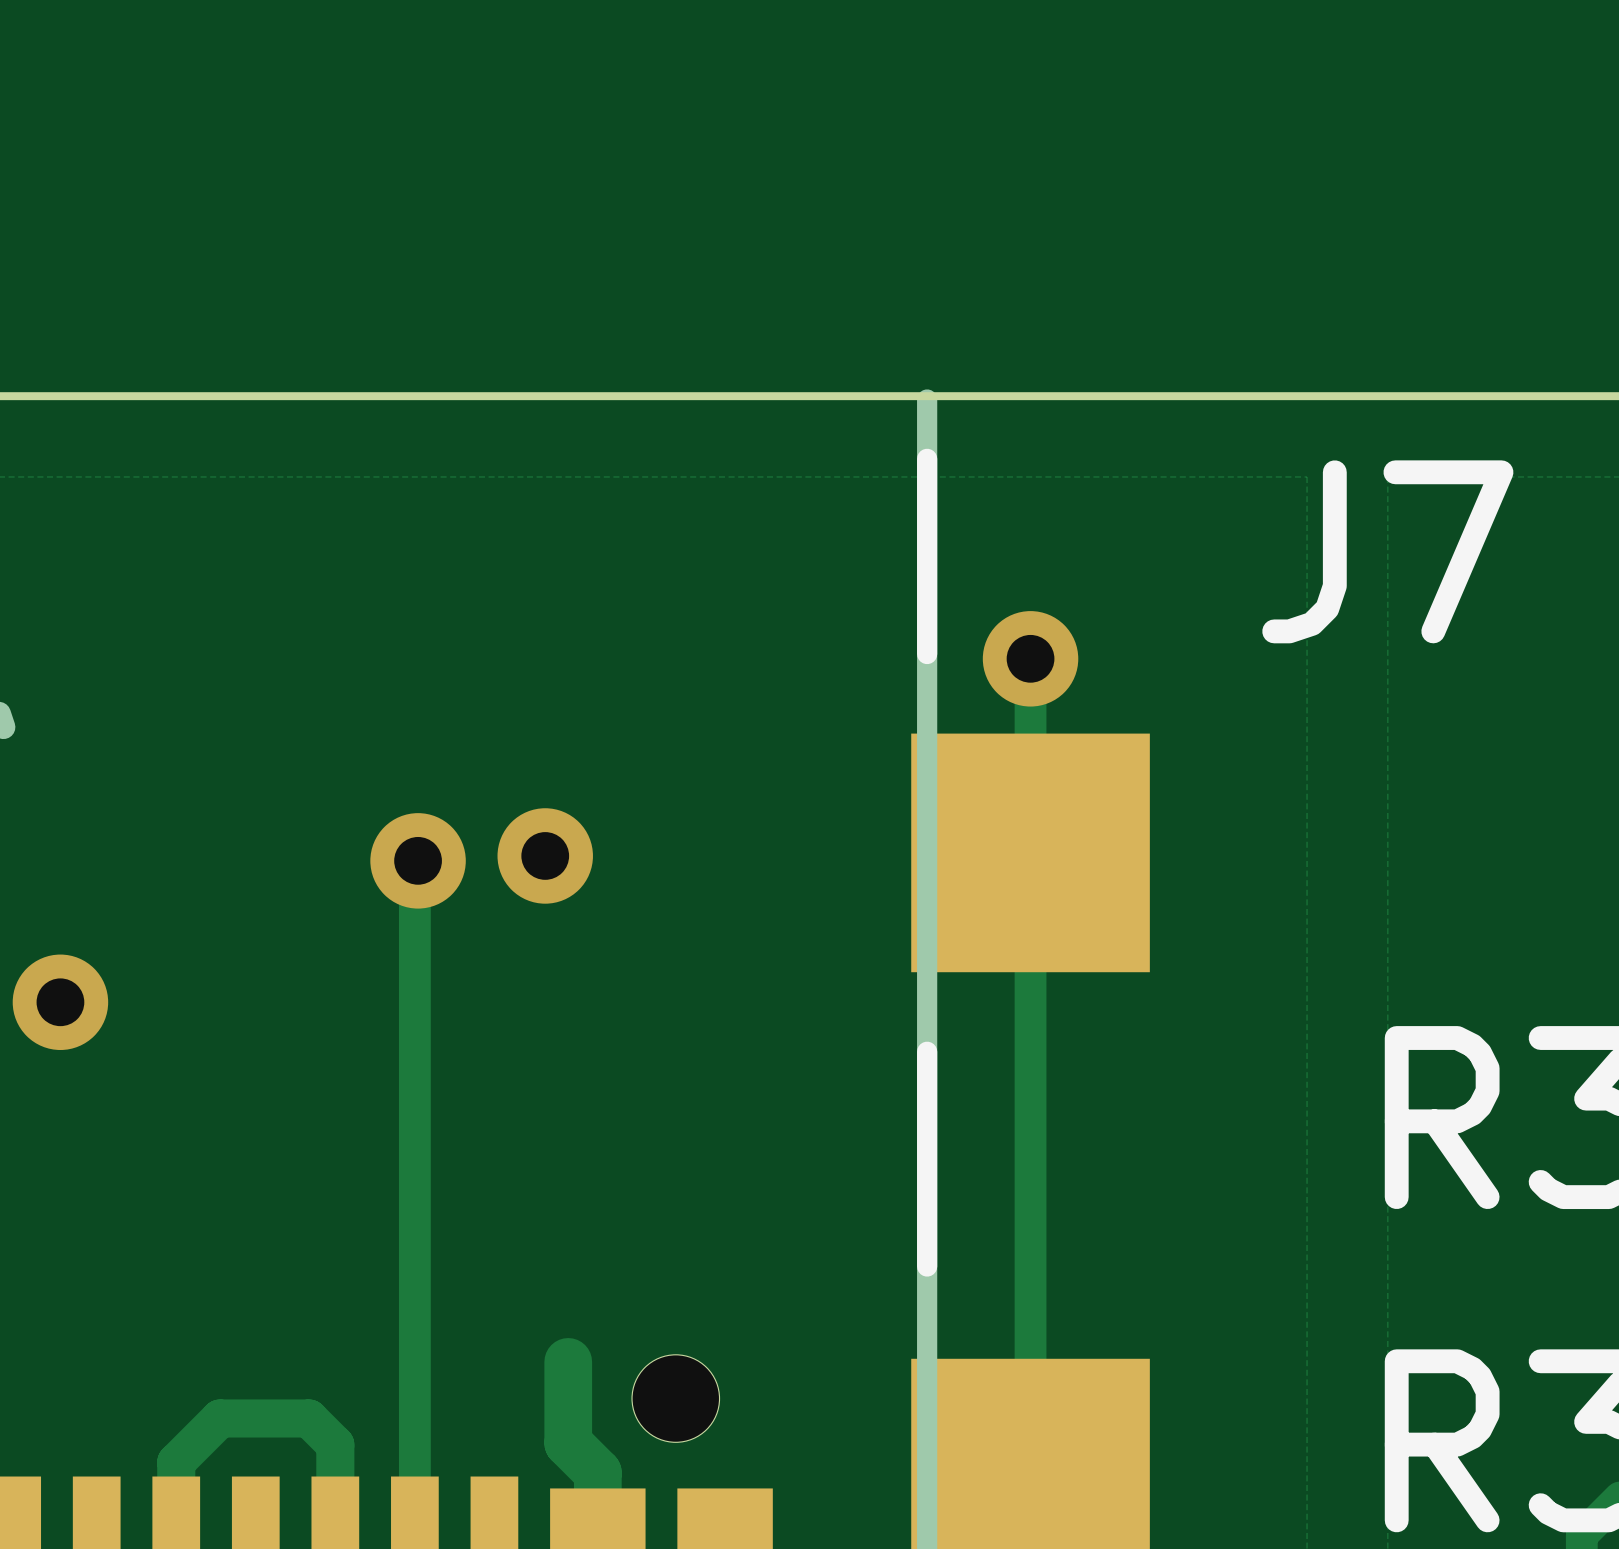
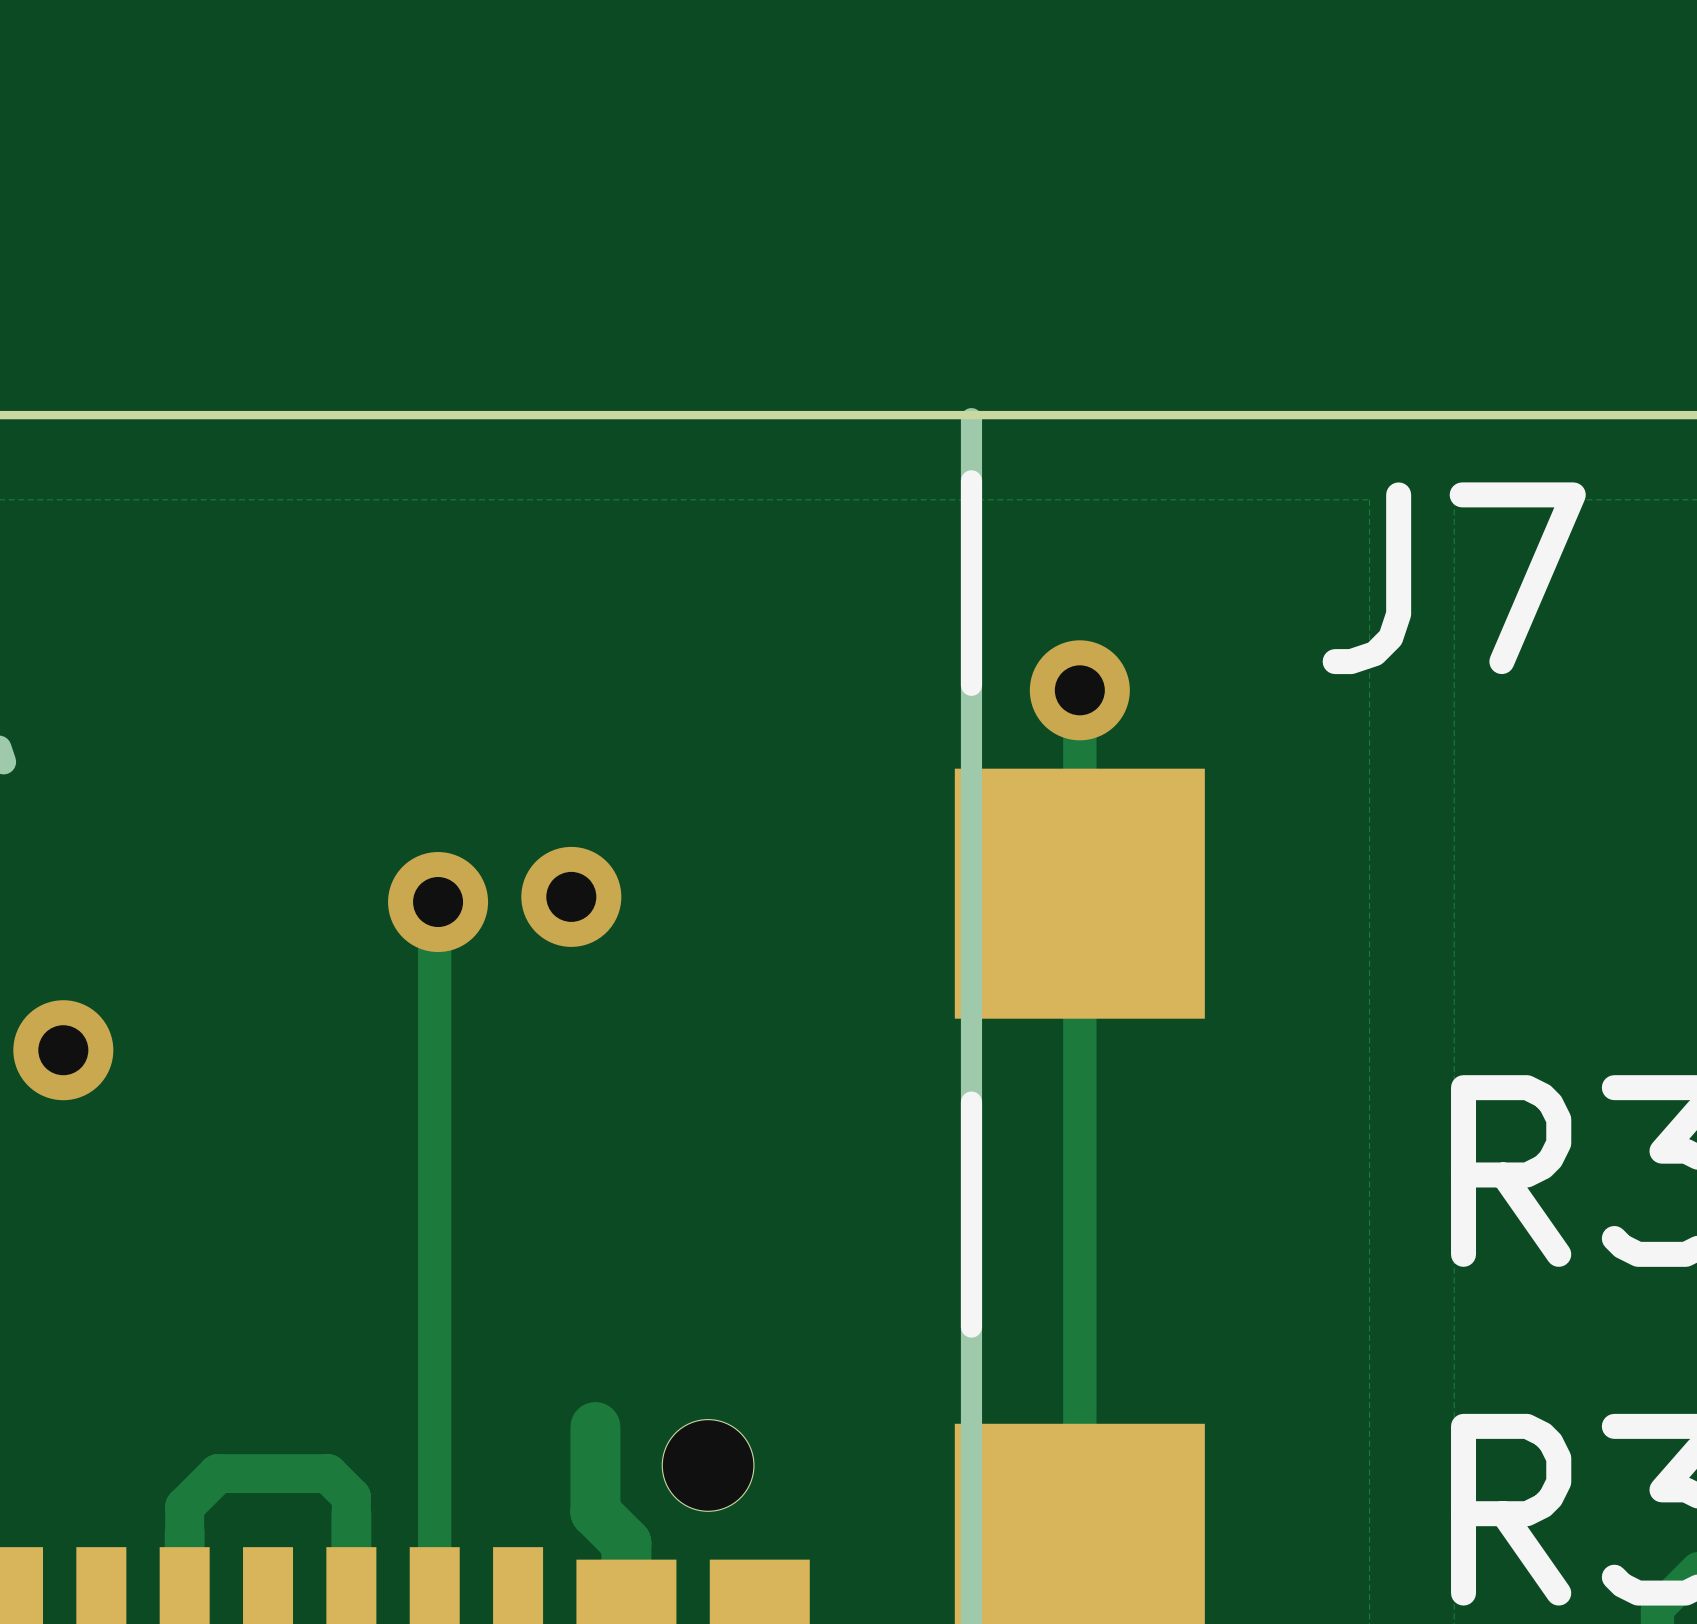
track: (335, 1444) (308, 1418) (220, 1418) (176, 1462) -> (351, 1513) (351, 1497) (327, 1473) (217, 1473) (184, 1506) (184, 1532)

